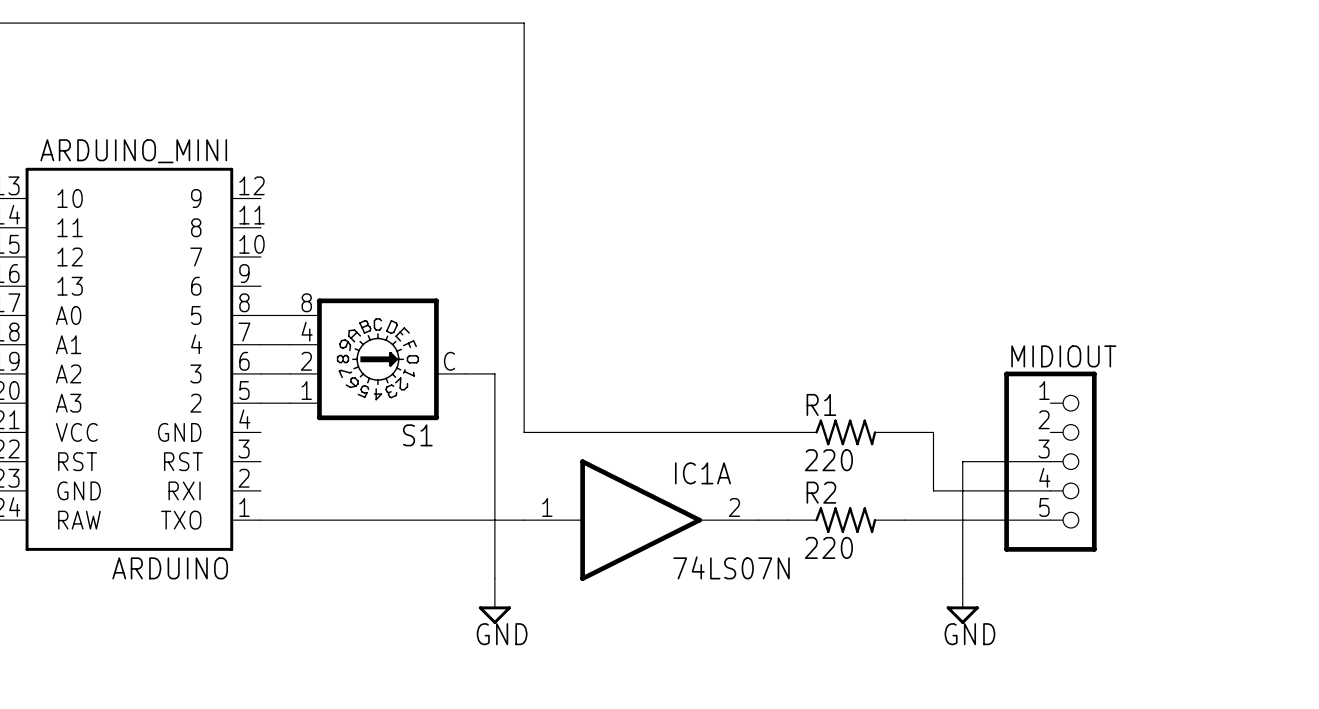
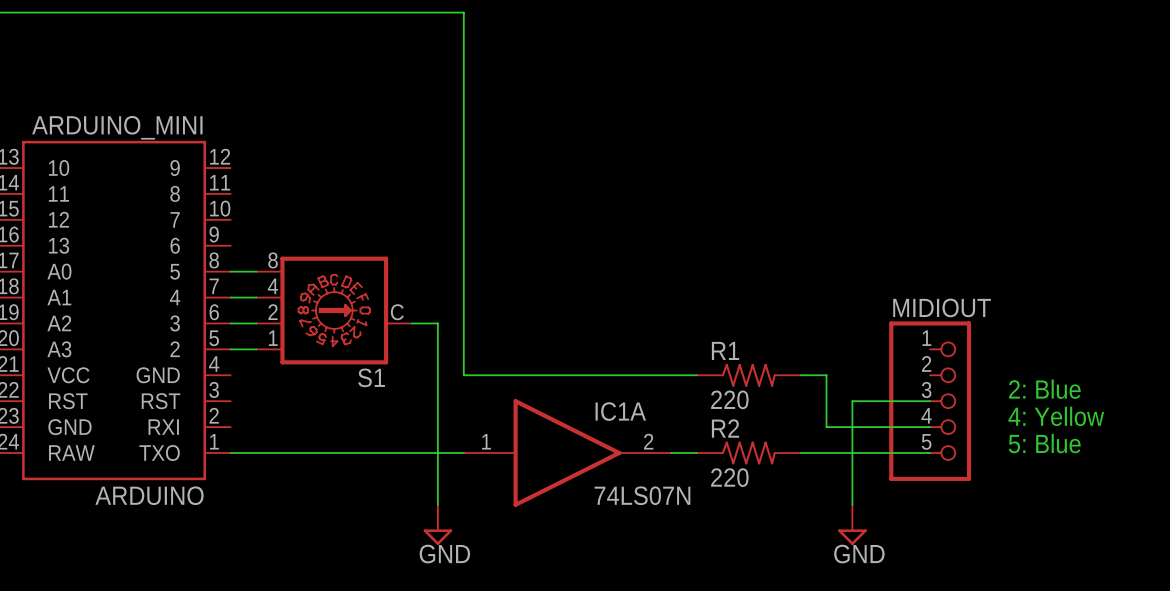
text: none -> 2: Blue (1044, 389)
text: none -> 4: Yellow (1056, 416)
text: none -> 5: Blue (1044, 443)

